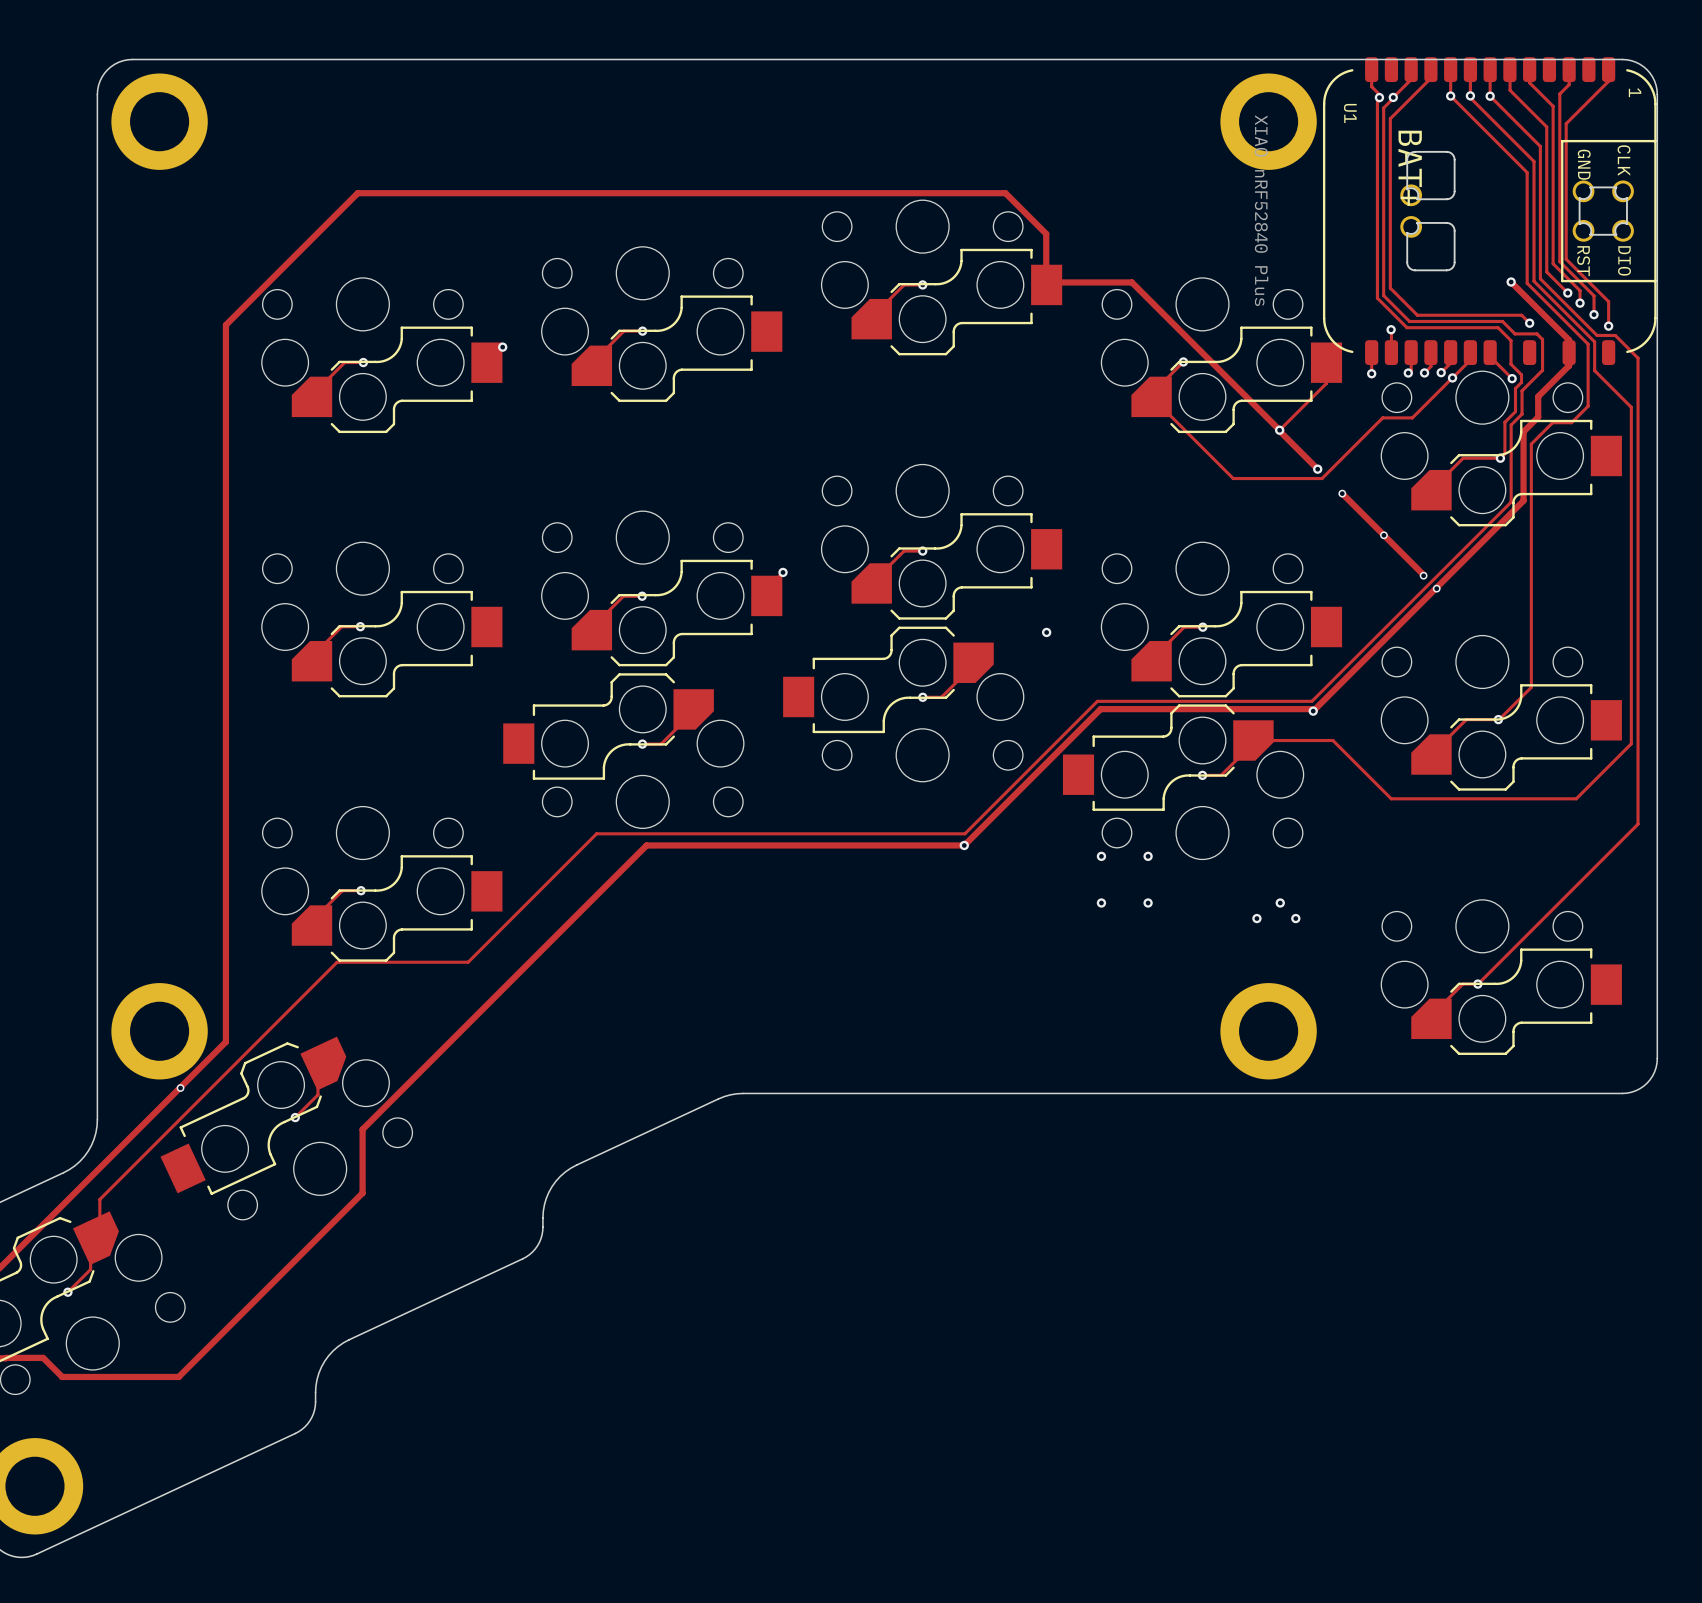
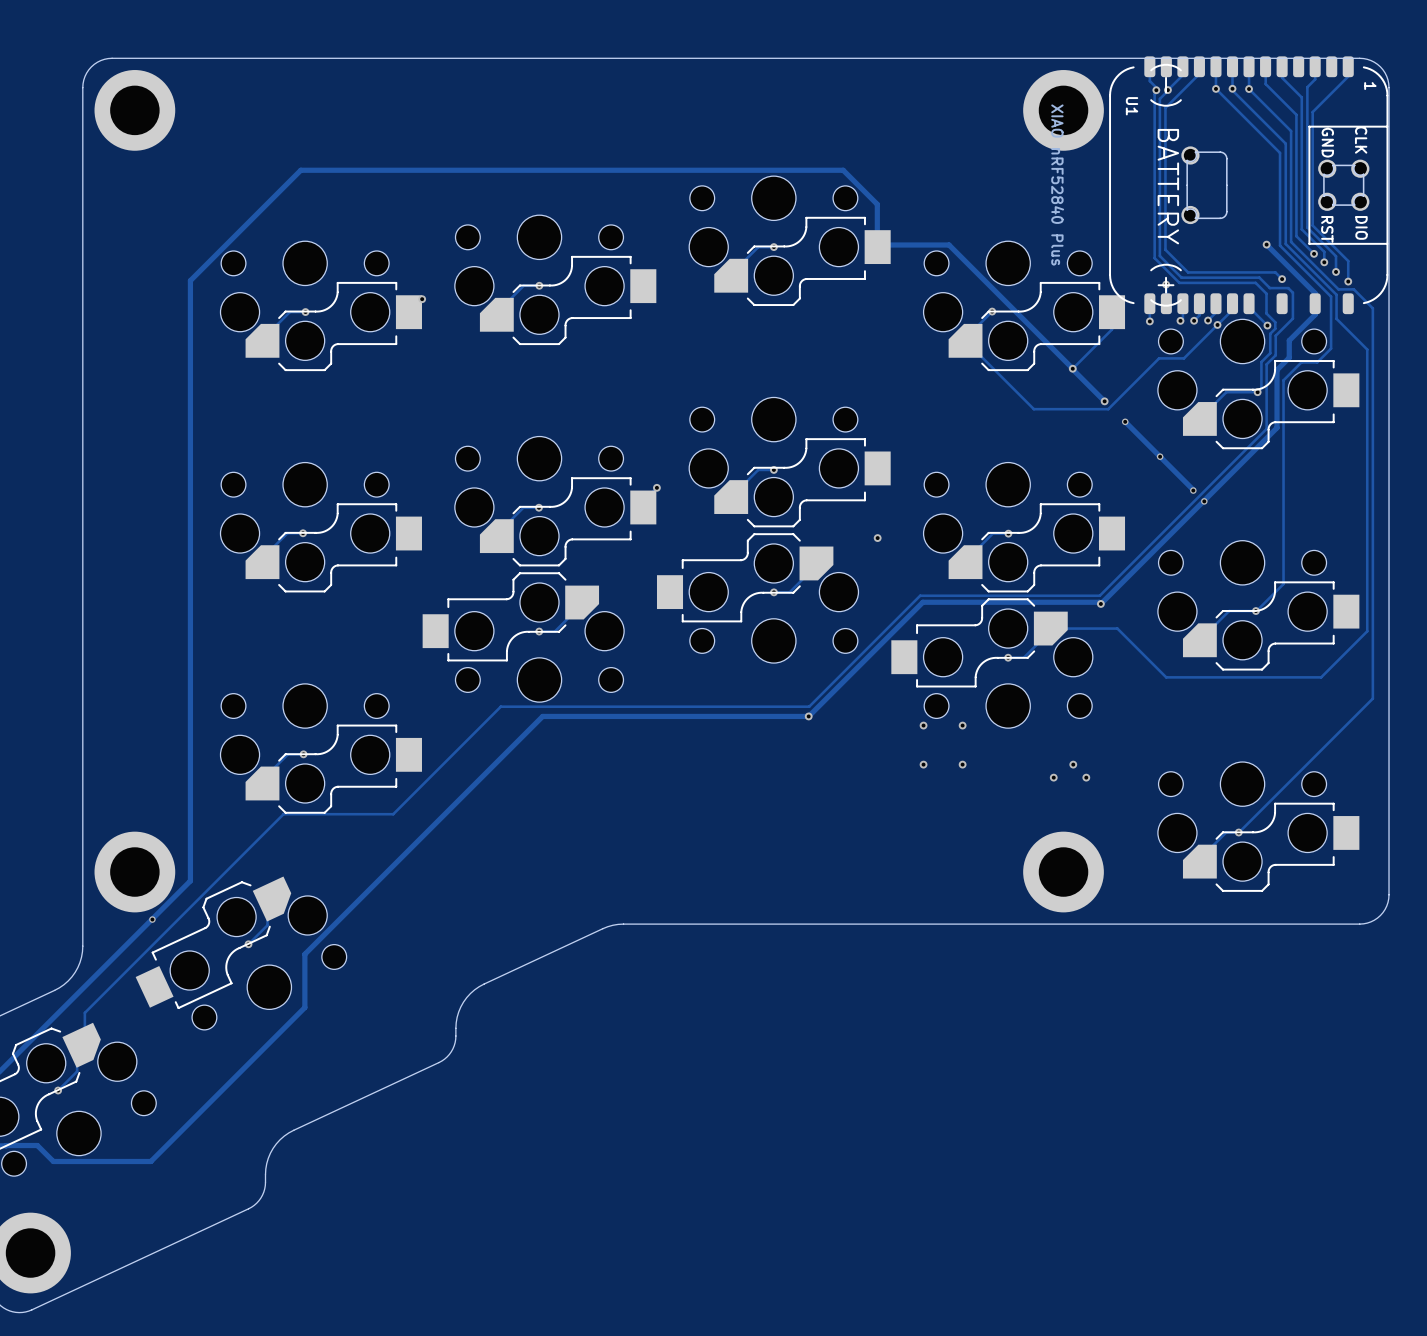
U1 footprint: [1322, 57, 1657, 366] -> [1109, 56, 1389, 315]
part: (1427, 243) -> none

